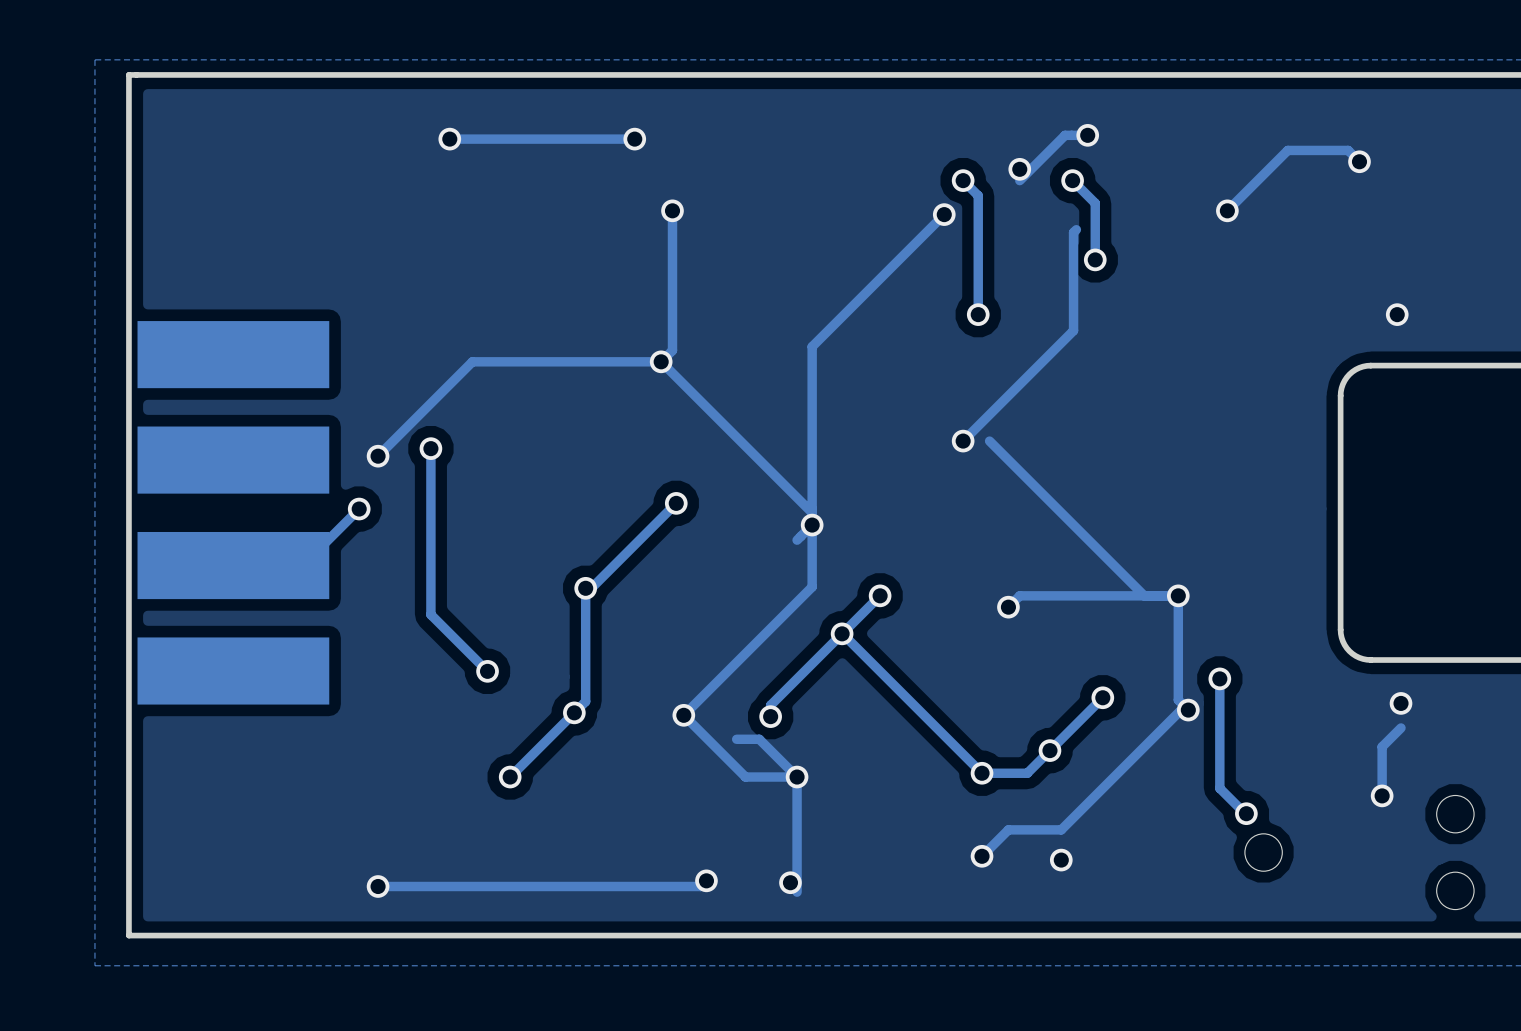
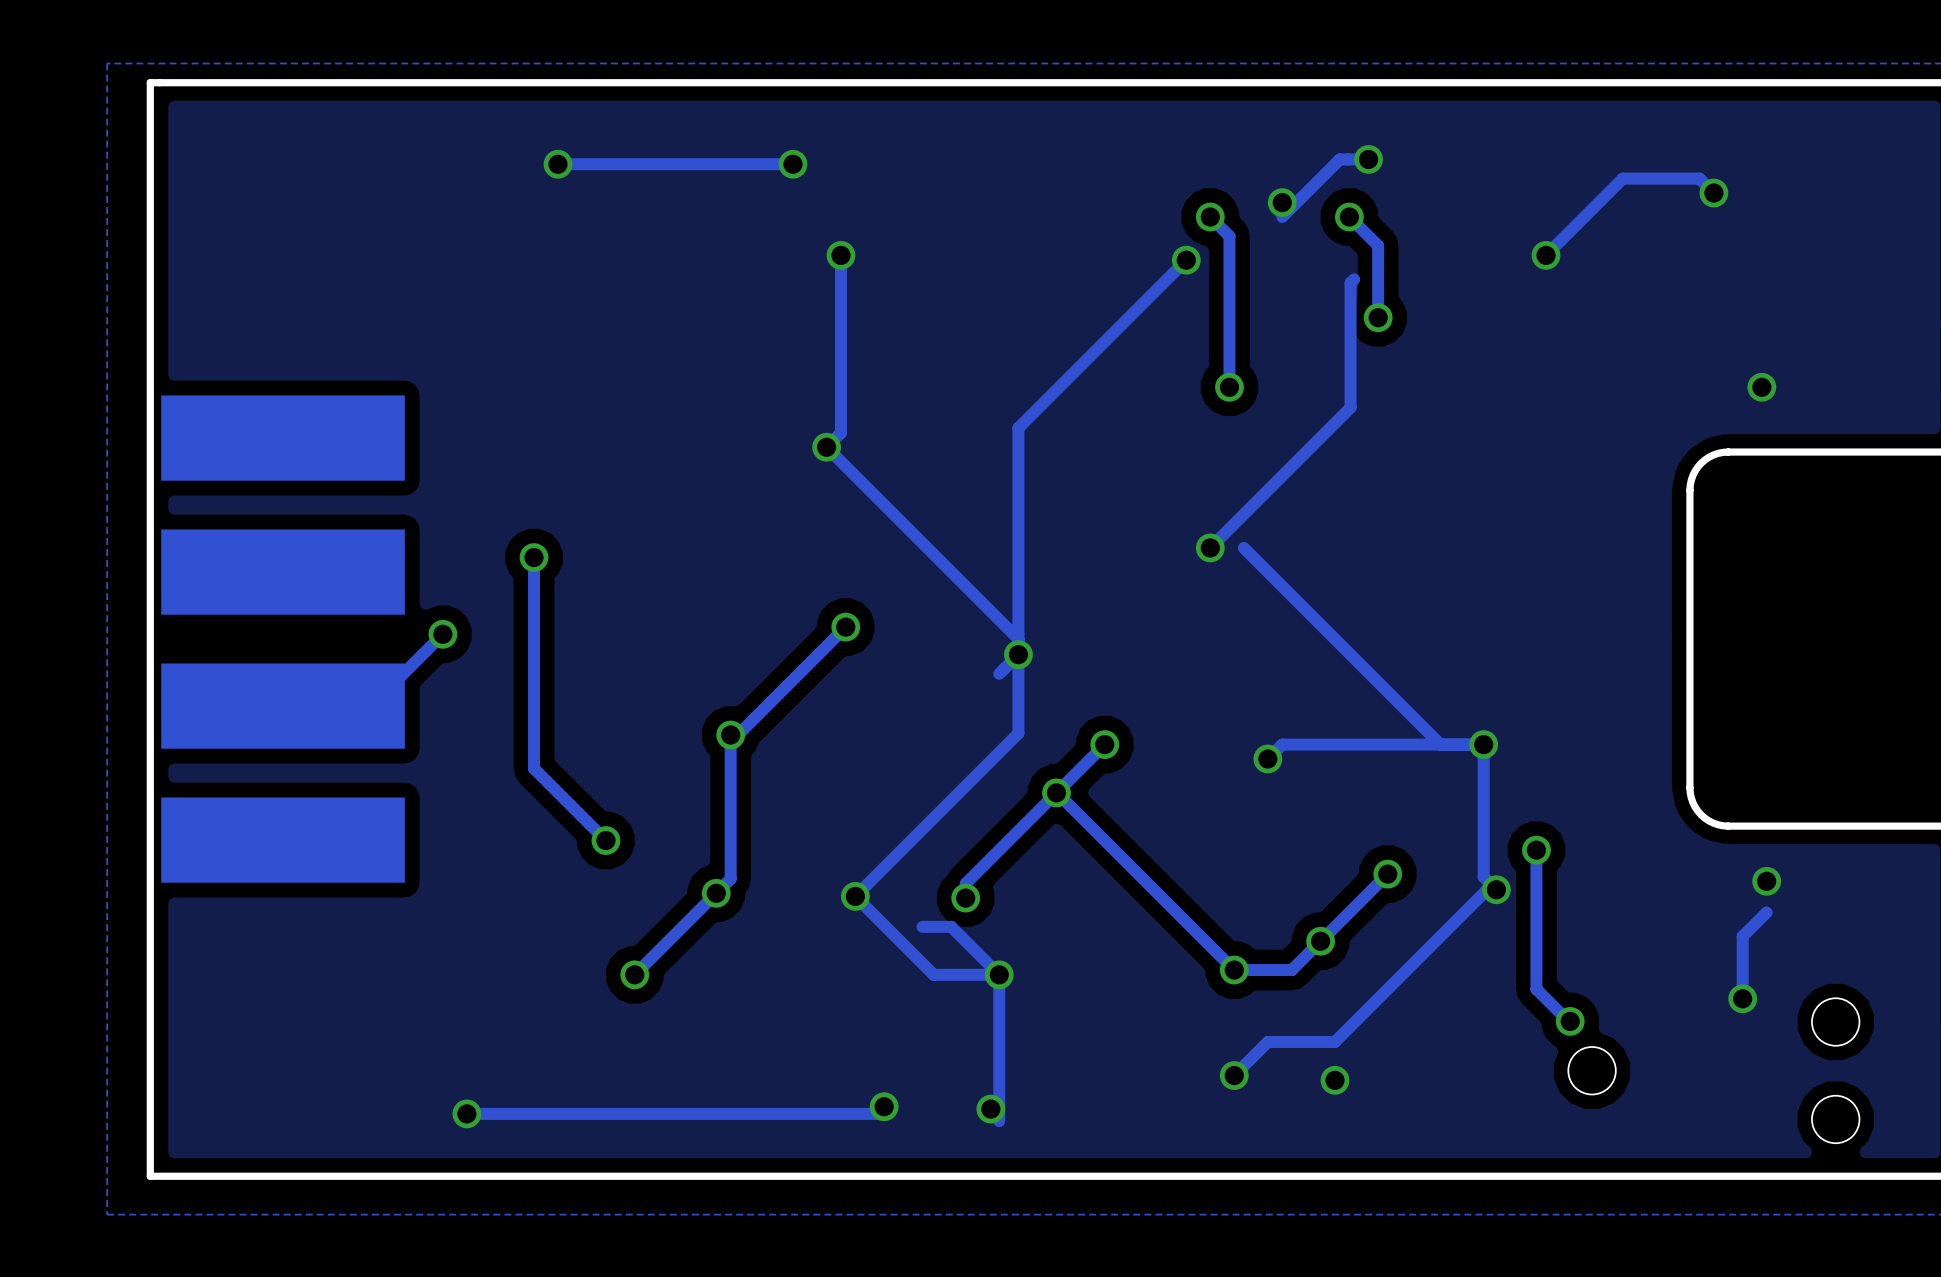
track: (661, 361) (472, 361) (378, 456) -> none
via: (378, 456) -> none

